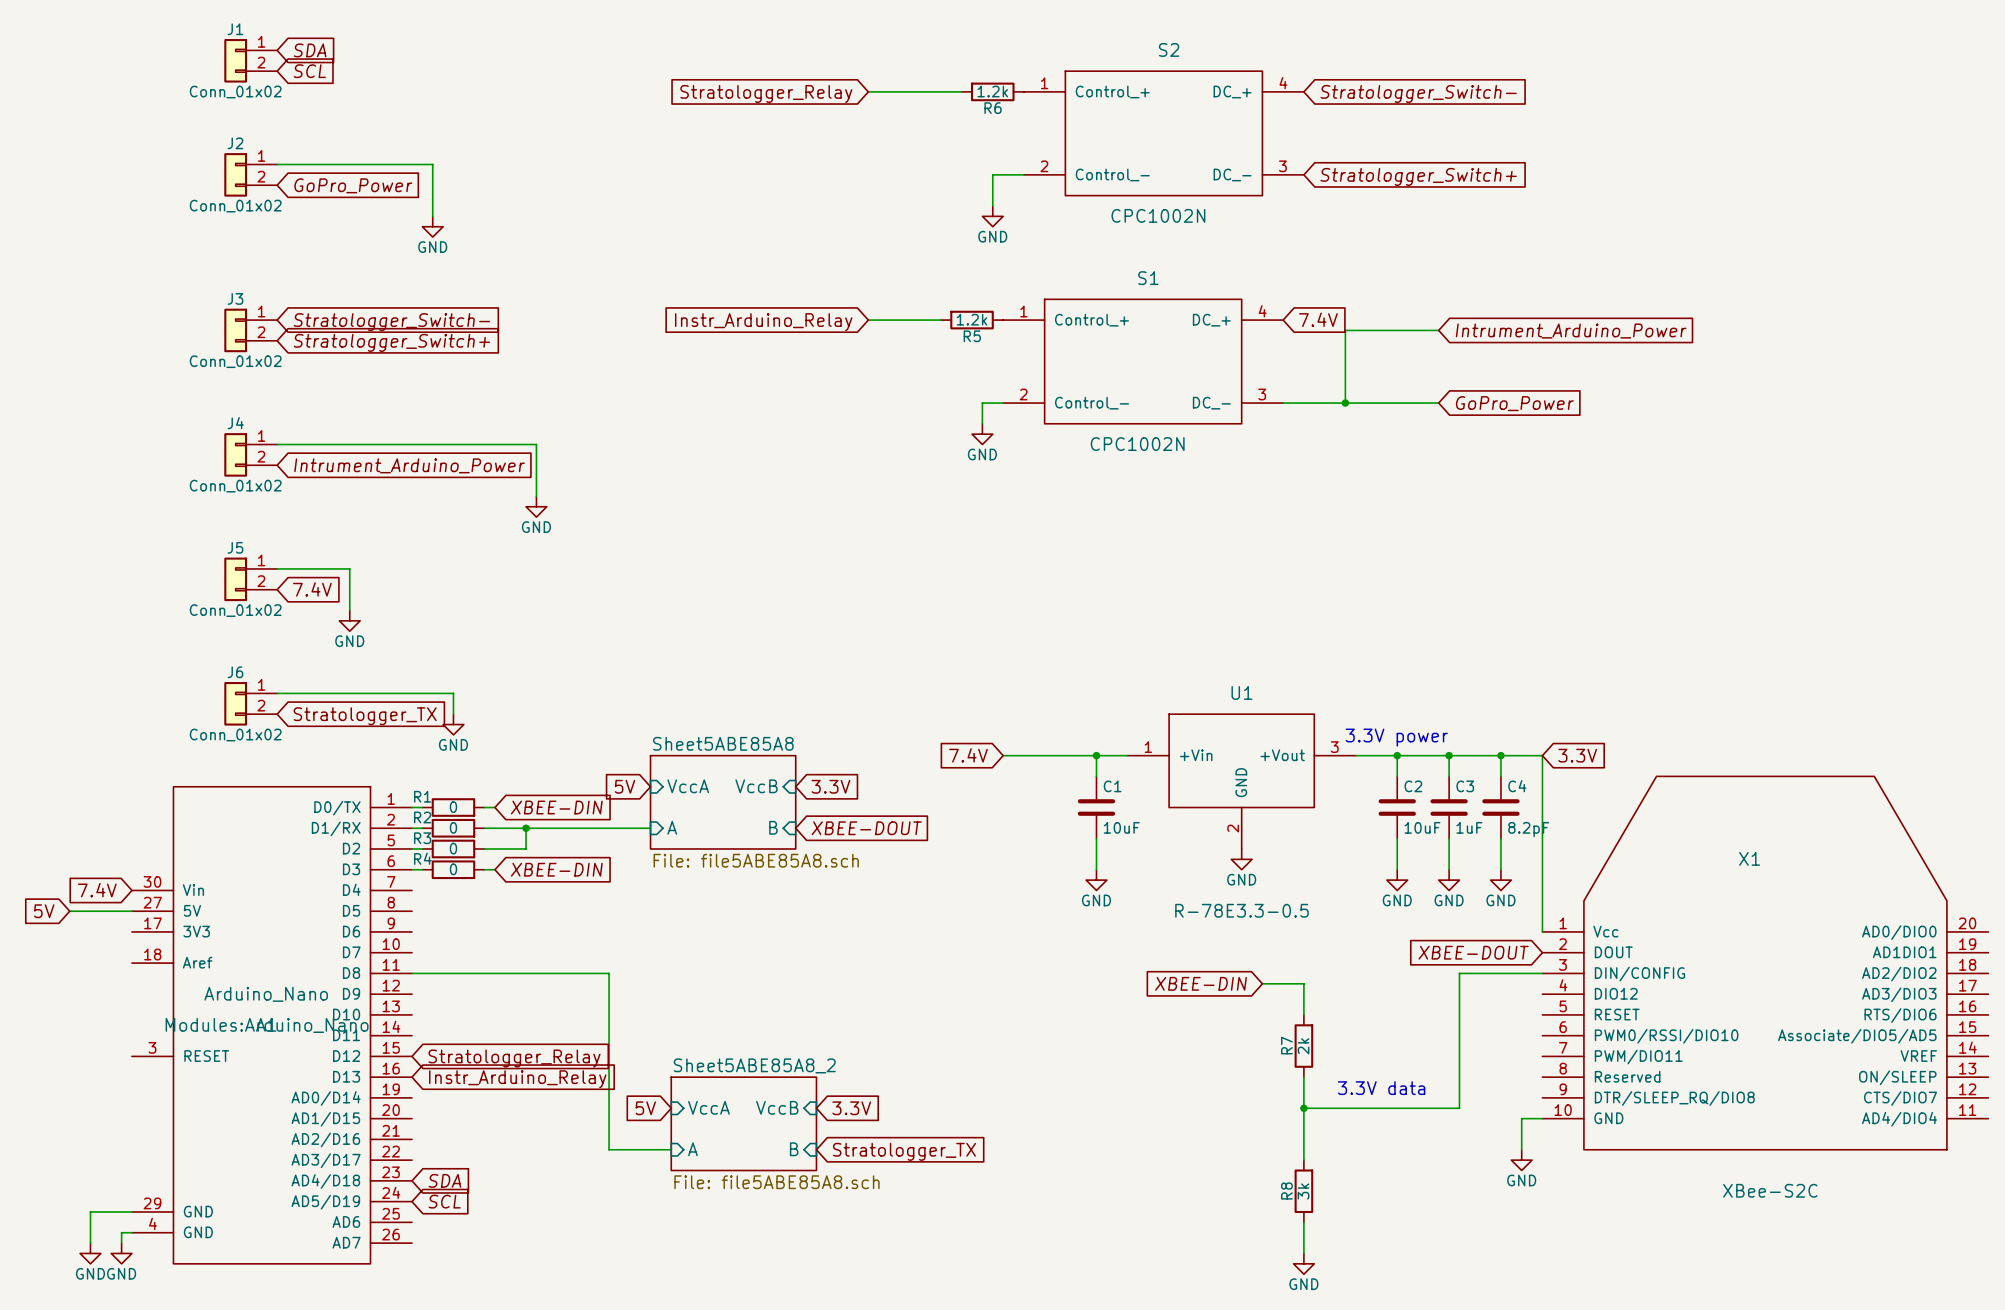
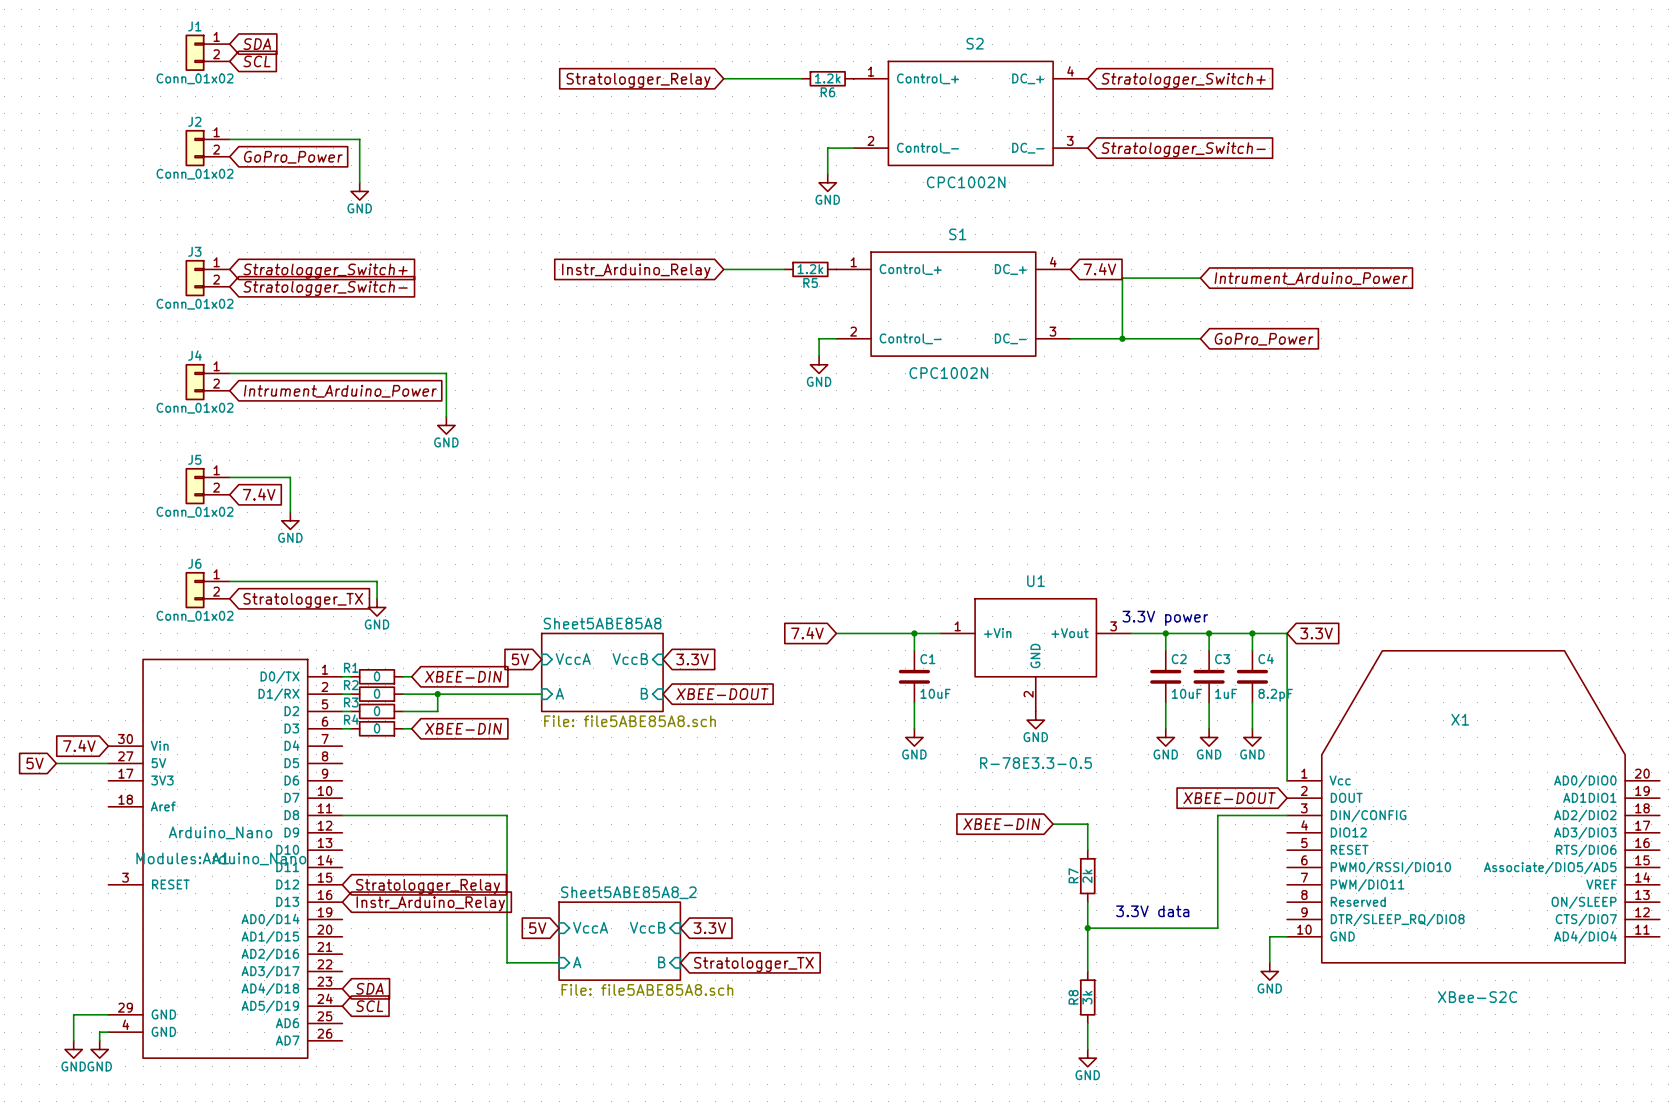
global label: Stratologger_Switch- (1418, 93) -> Stratologger_Switch+ (1183, 80)
global label: Stratologger_Switch+ (1418, 176) -> Stratologger_Switch- (1183, 149)
global label: Stratologger_Switch- (391, 322) -> Stratologger_Switch+ (325, 271)
global label: Stratologger_Switch+ (391, 342) -> Stratologger_Switch- (325, 288)

